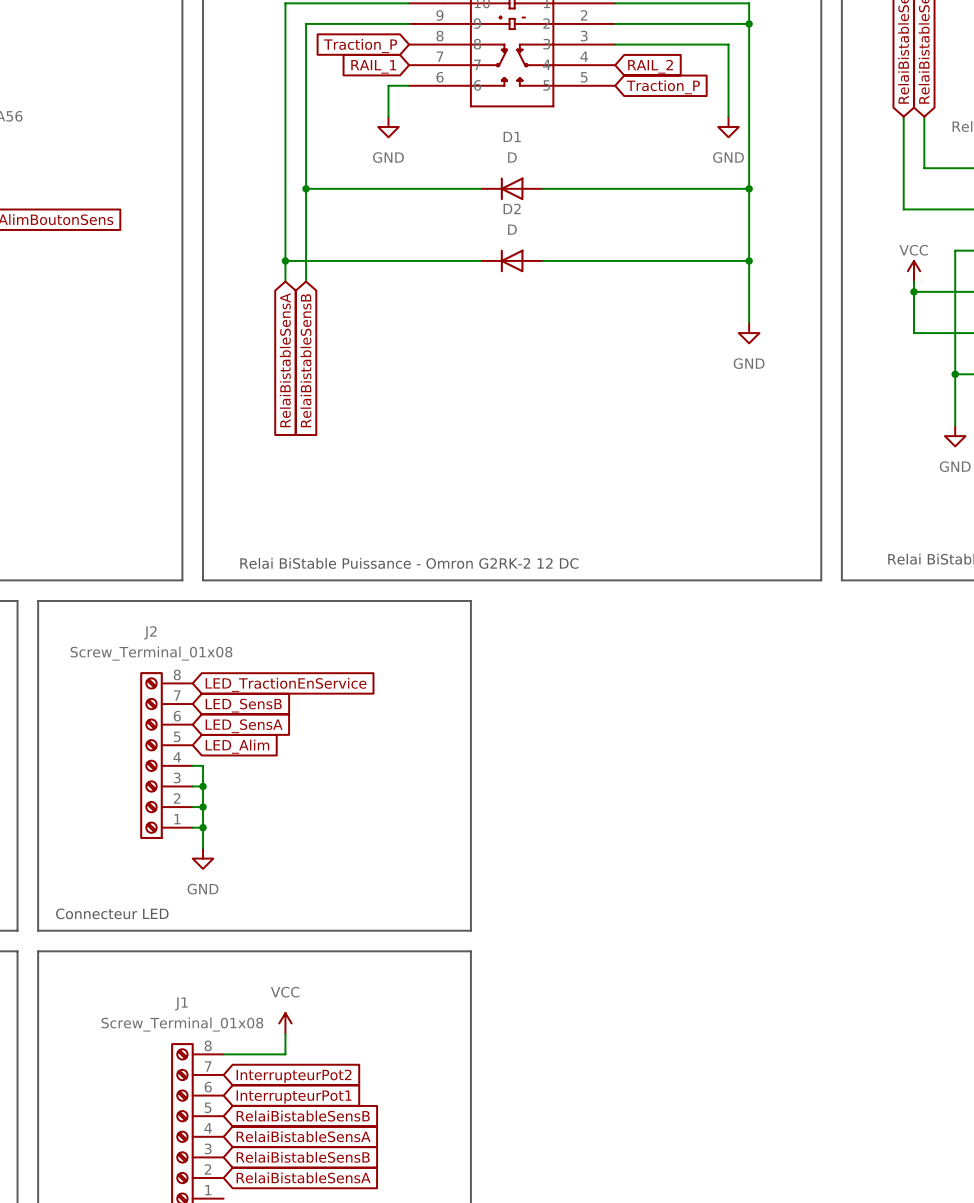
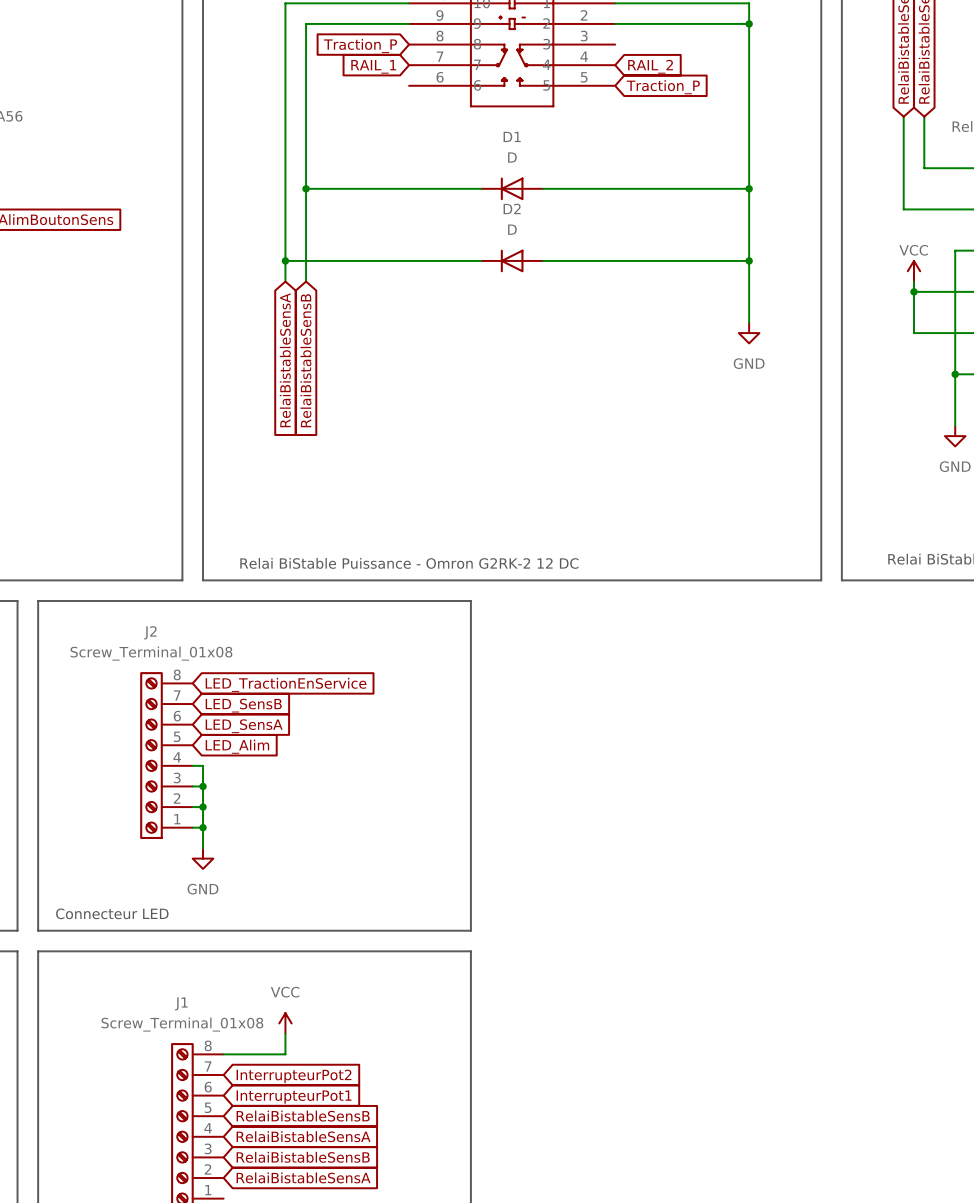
wire: (615, 44) (728, 44) (728, 116) -> none
wire: (409, 85) (388, 85) (388, 116) -> none
power symbol: GND (388, 127) -> none
power symbol: GND (728, 127) -> none

